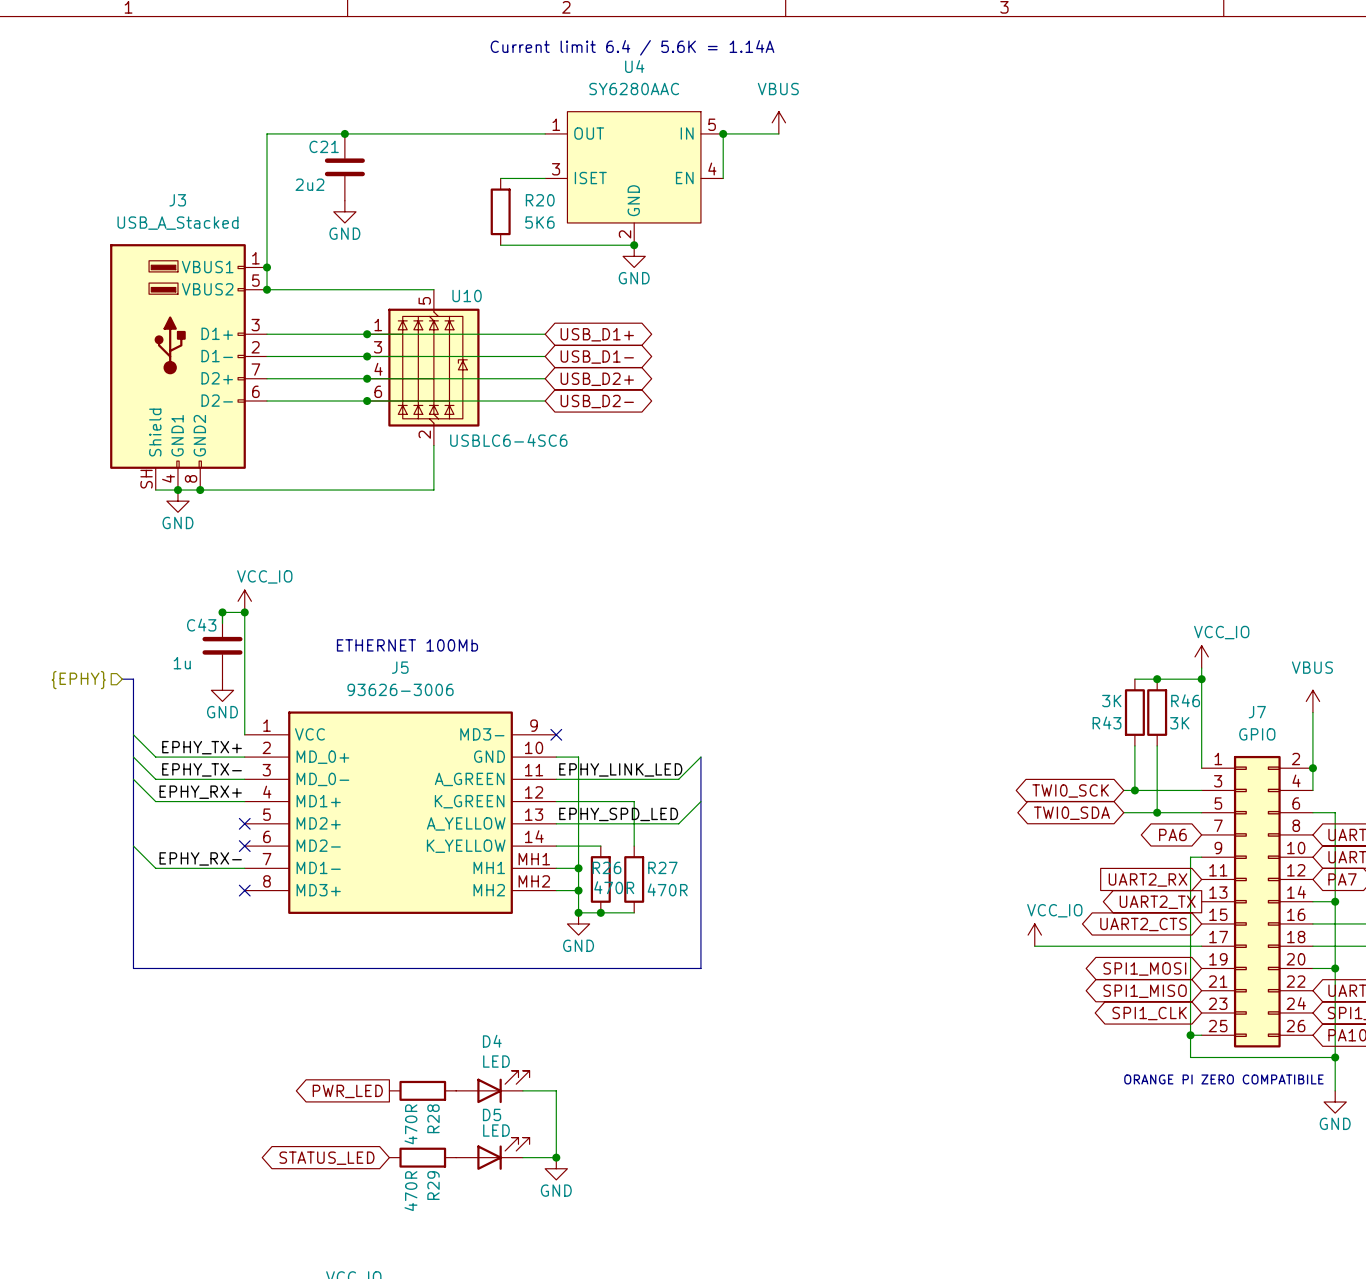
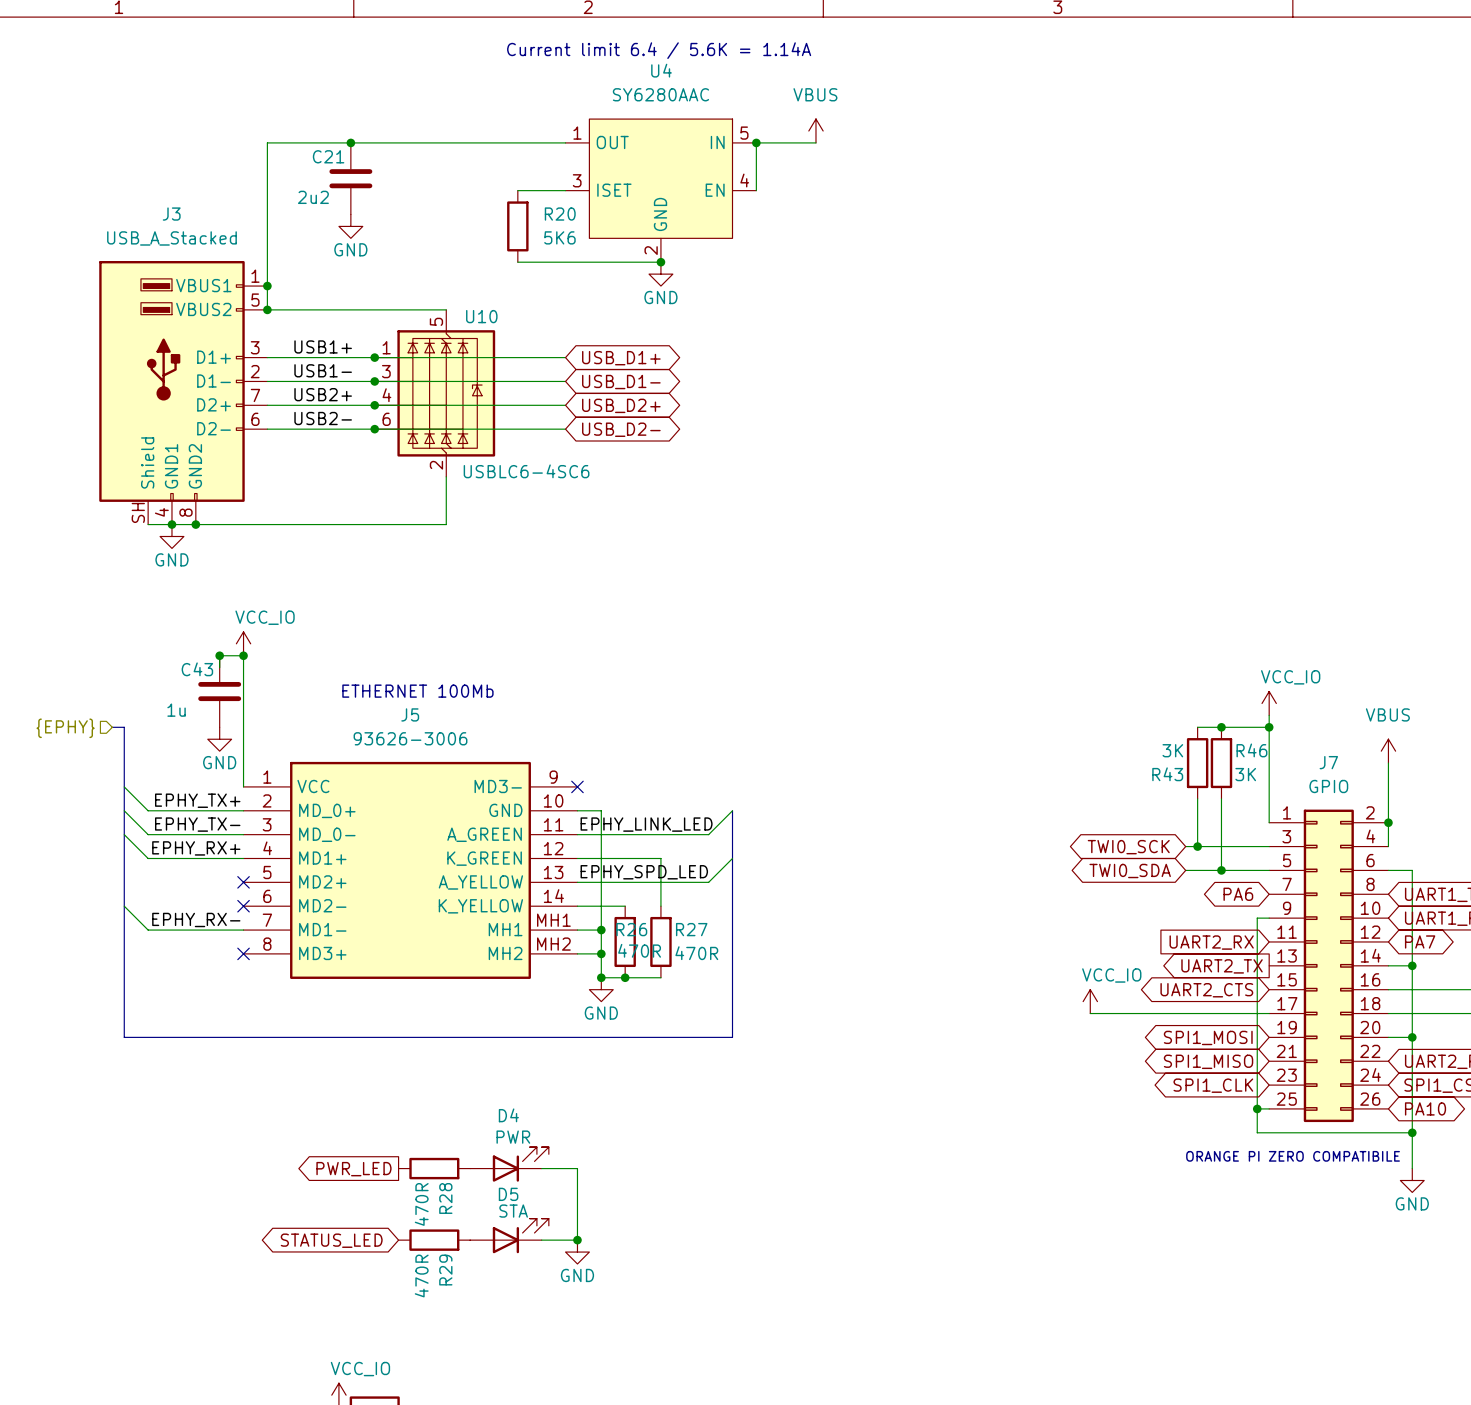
label: none -> USB1+ (323, 346)
label: none -> USB1- (323, 370)
label: none -> USB2+ (323, 394)
label: none -> USB2- (323, 418)
D4 value: LED (496, 1061) -> PWR (513, 1137)
D5 value: LED (496, 1130) -> STA (513, 1211)

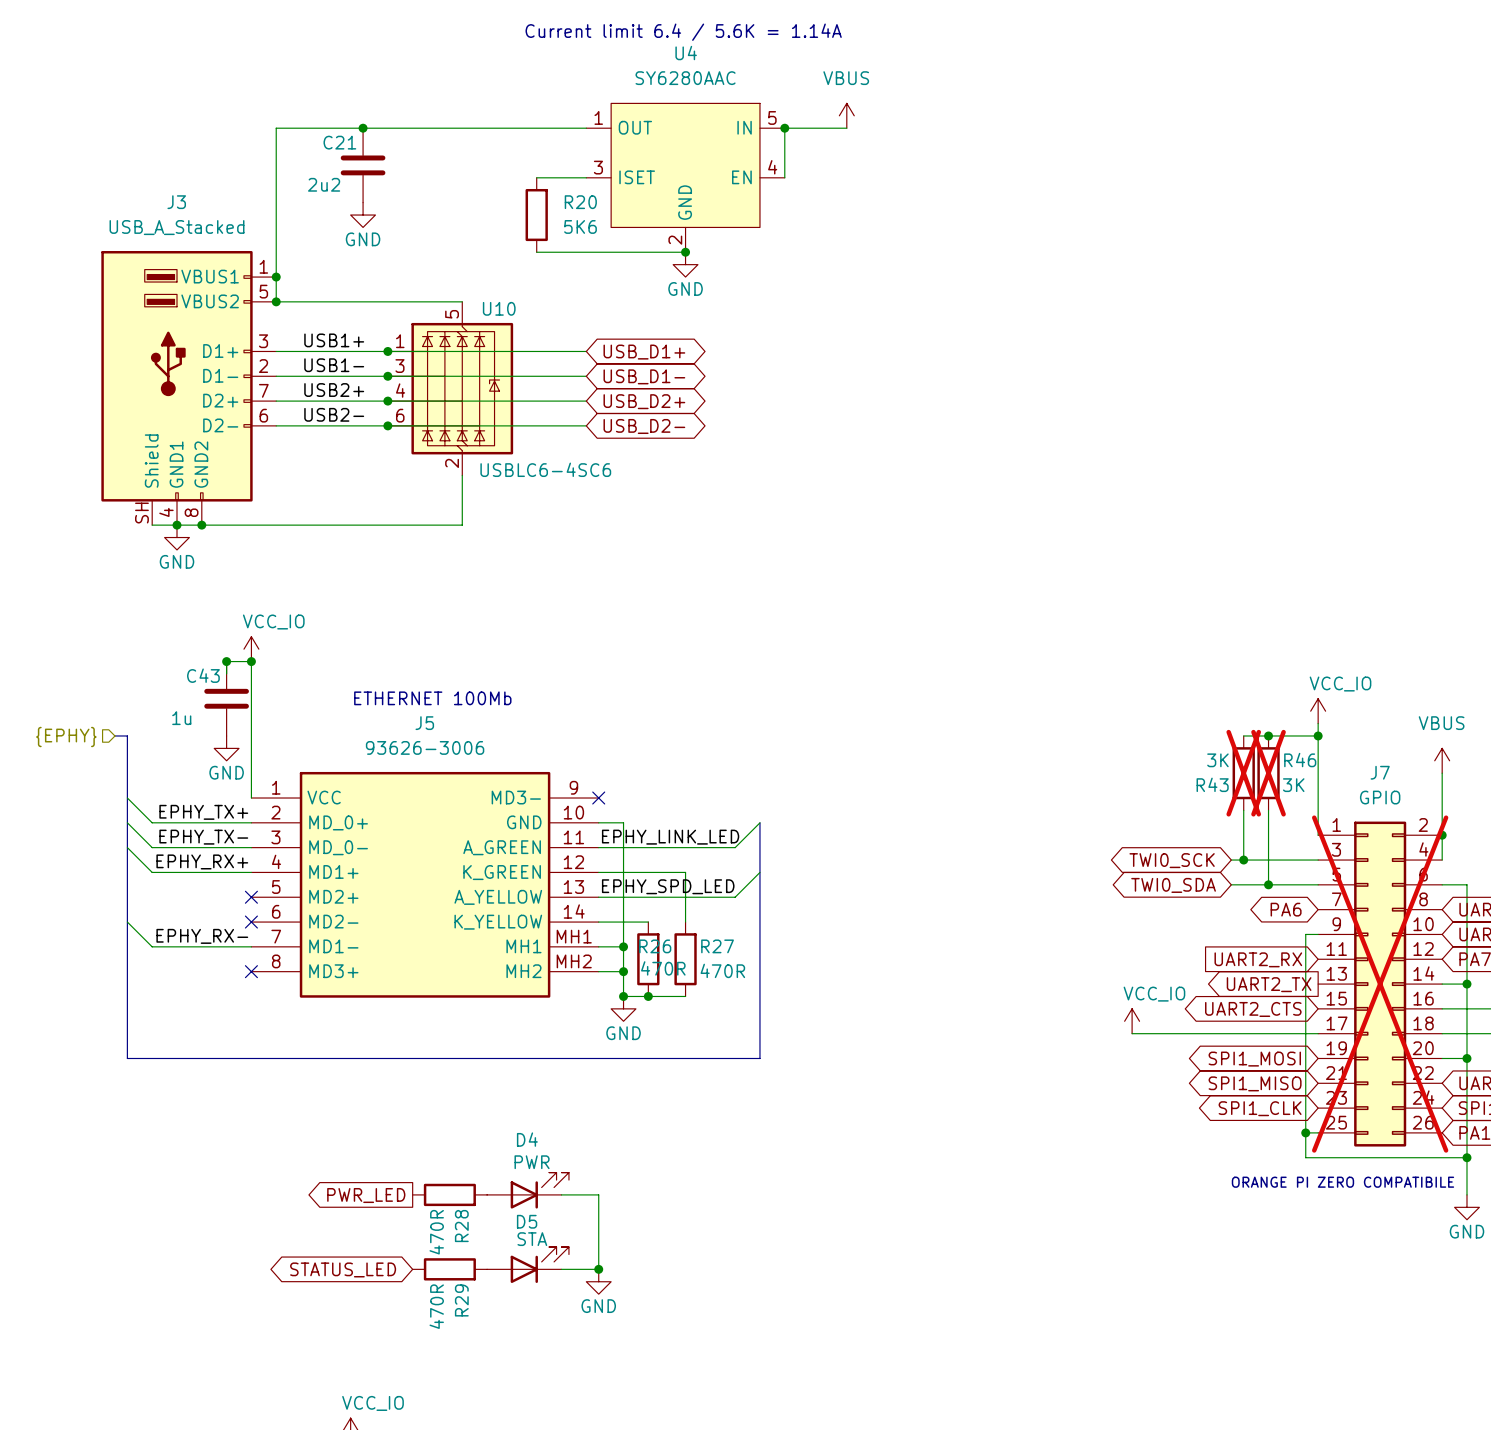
R43 do-not-place cross: none -> (1243, 773)
R46 do-not-place cross: none -> (1268, 773)
J7 do-not-place cross: none -> (1380, 984)

